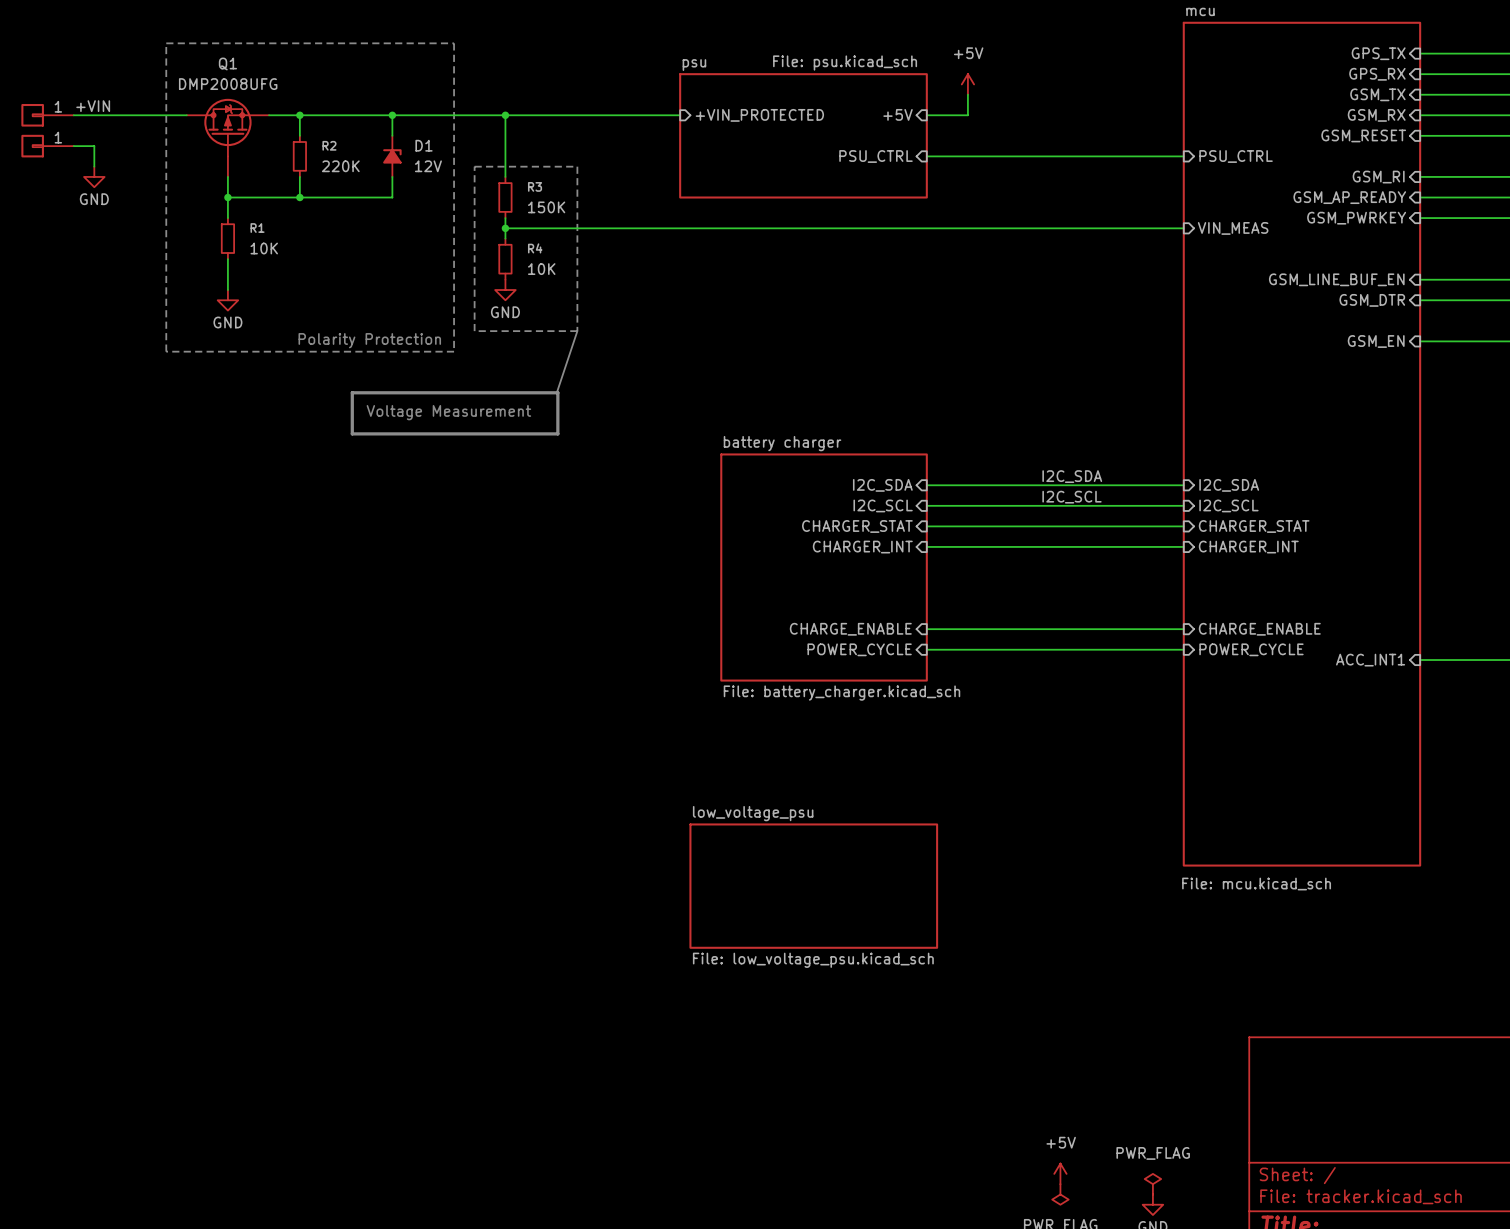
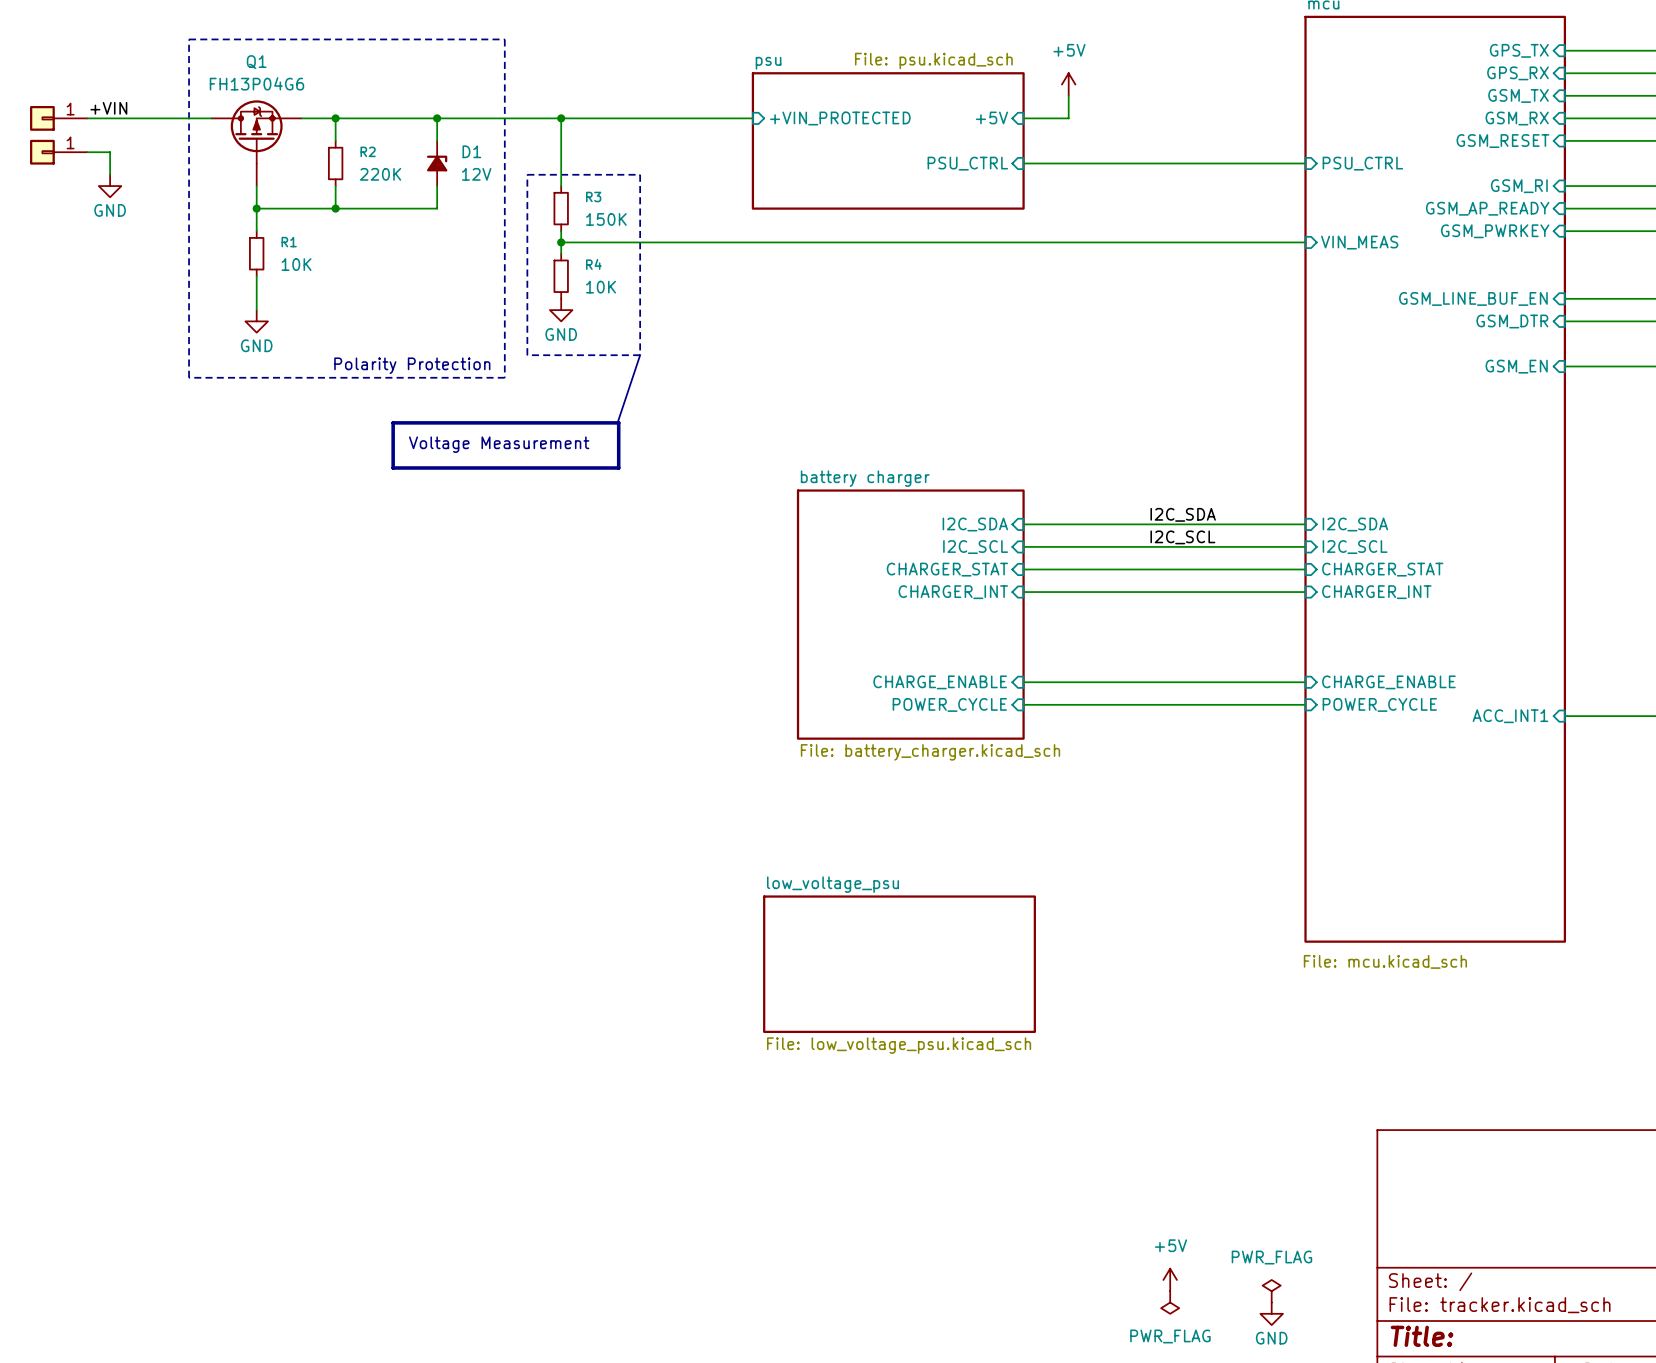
Q1 value: DMP2008UFG (228, 84) -> FH13P04G6 (256, 83)

